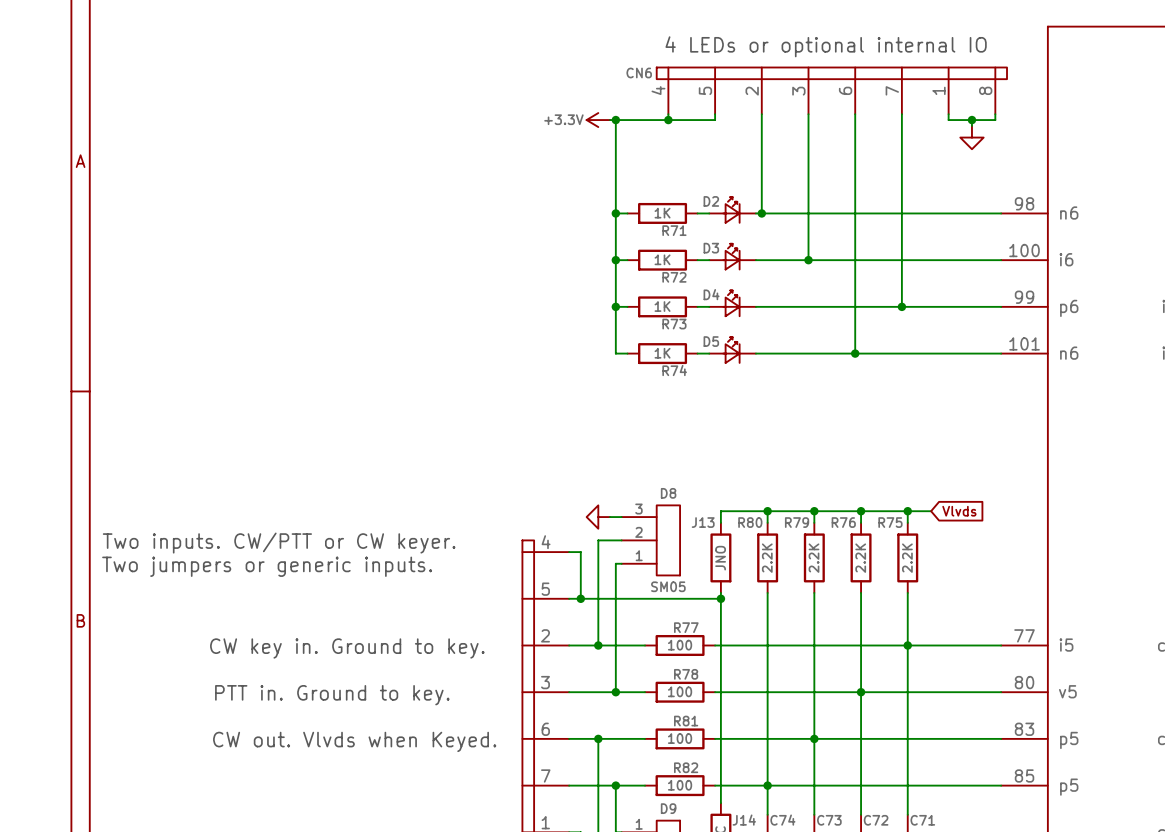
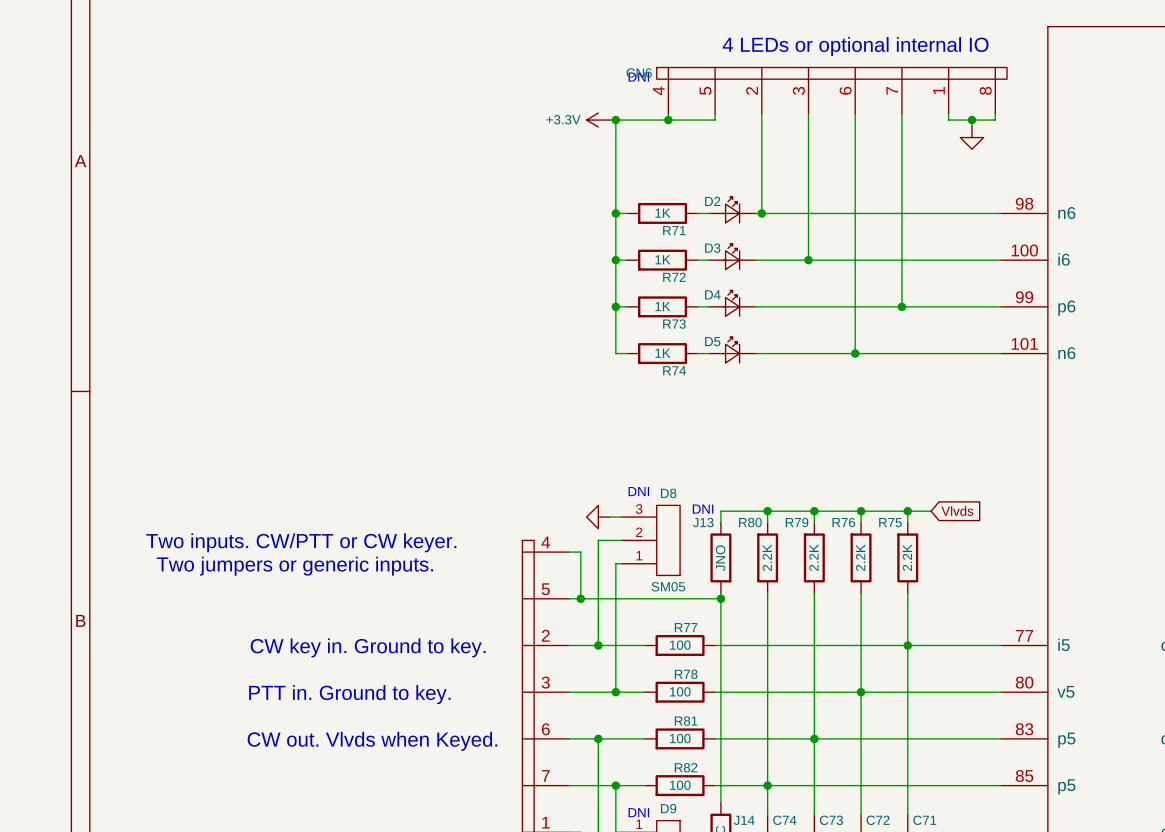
text: none -> DNI (638, 77)
text: none -> DNI (638, 491)
text: none -> DNI (703, 509)
text: none -> DNI (638, 812)

